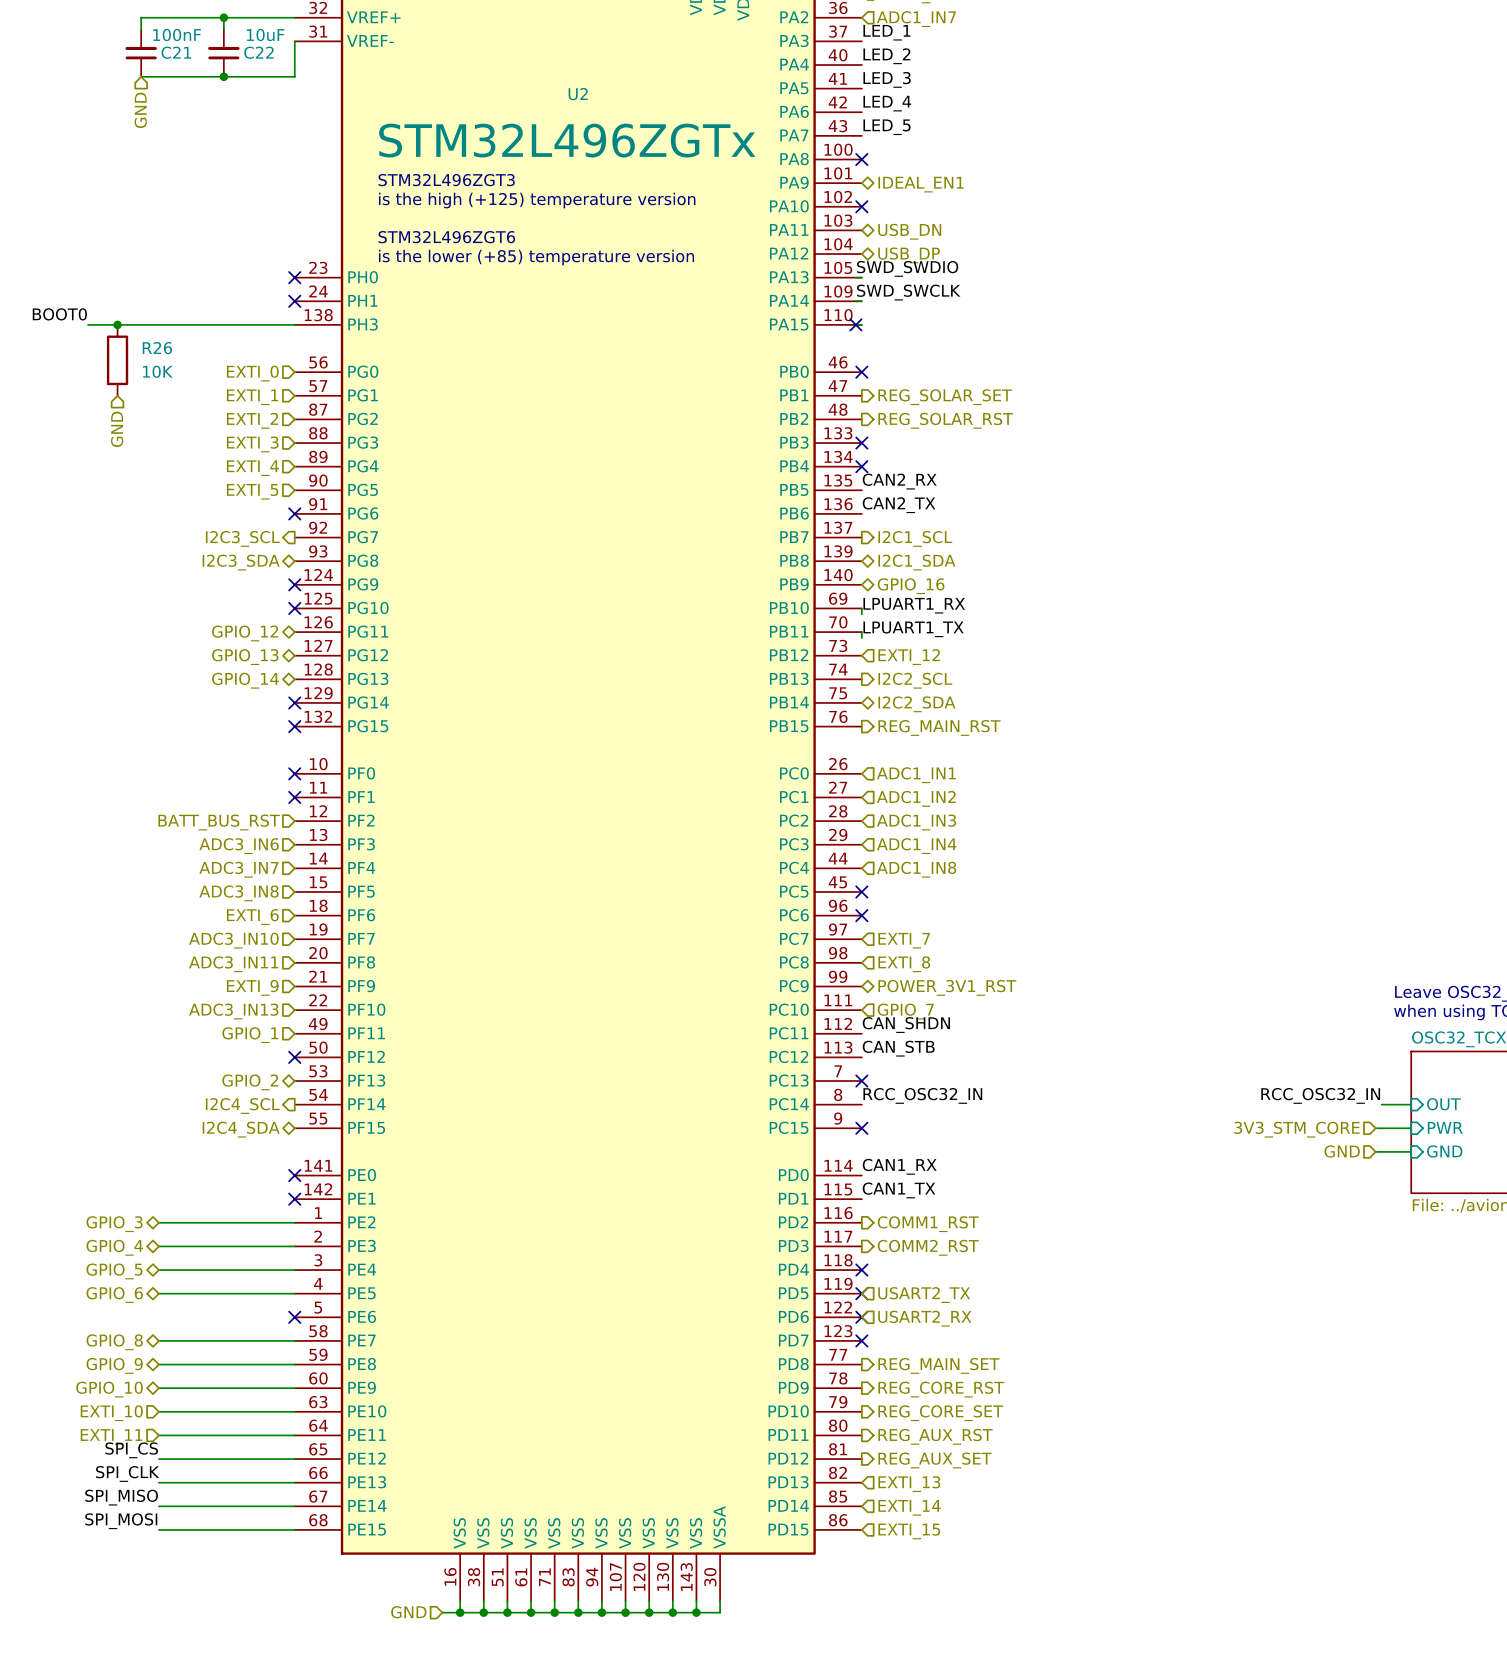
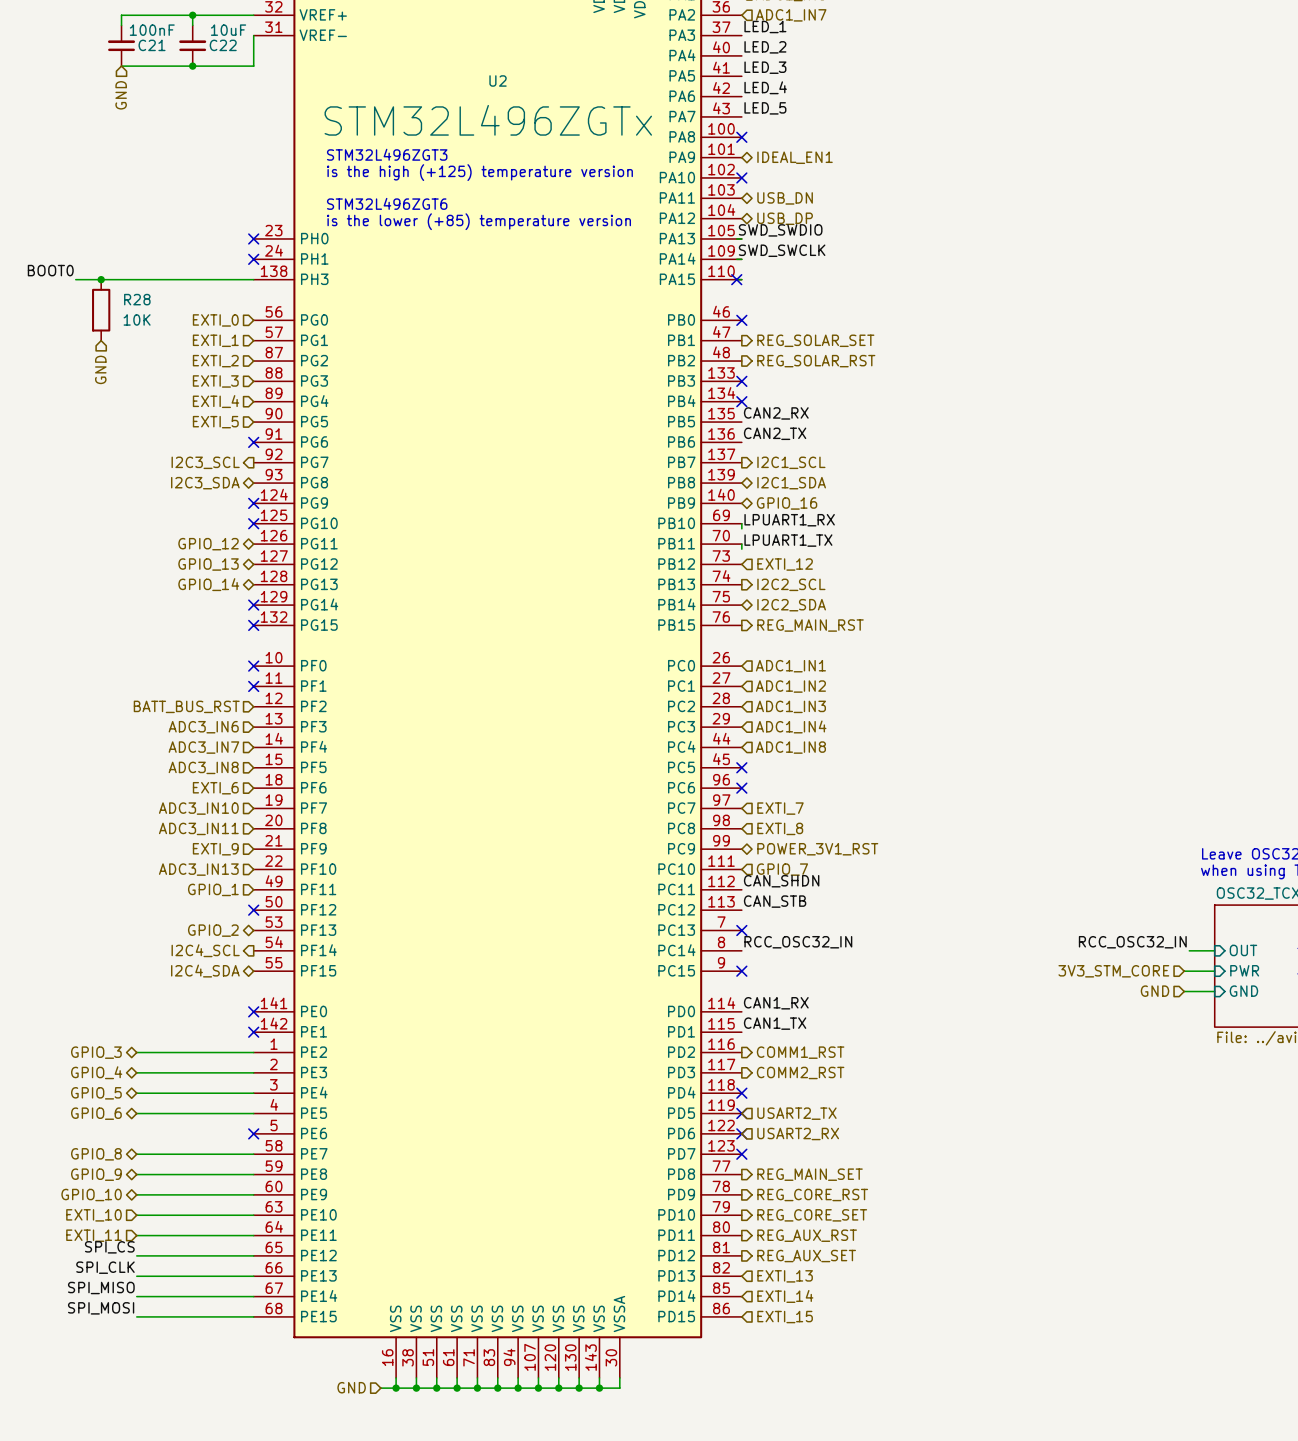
R26 name: R26 (157, 348) -> R28 (137, 299)

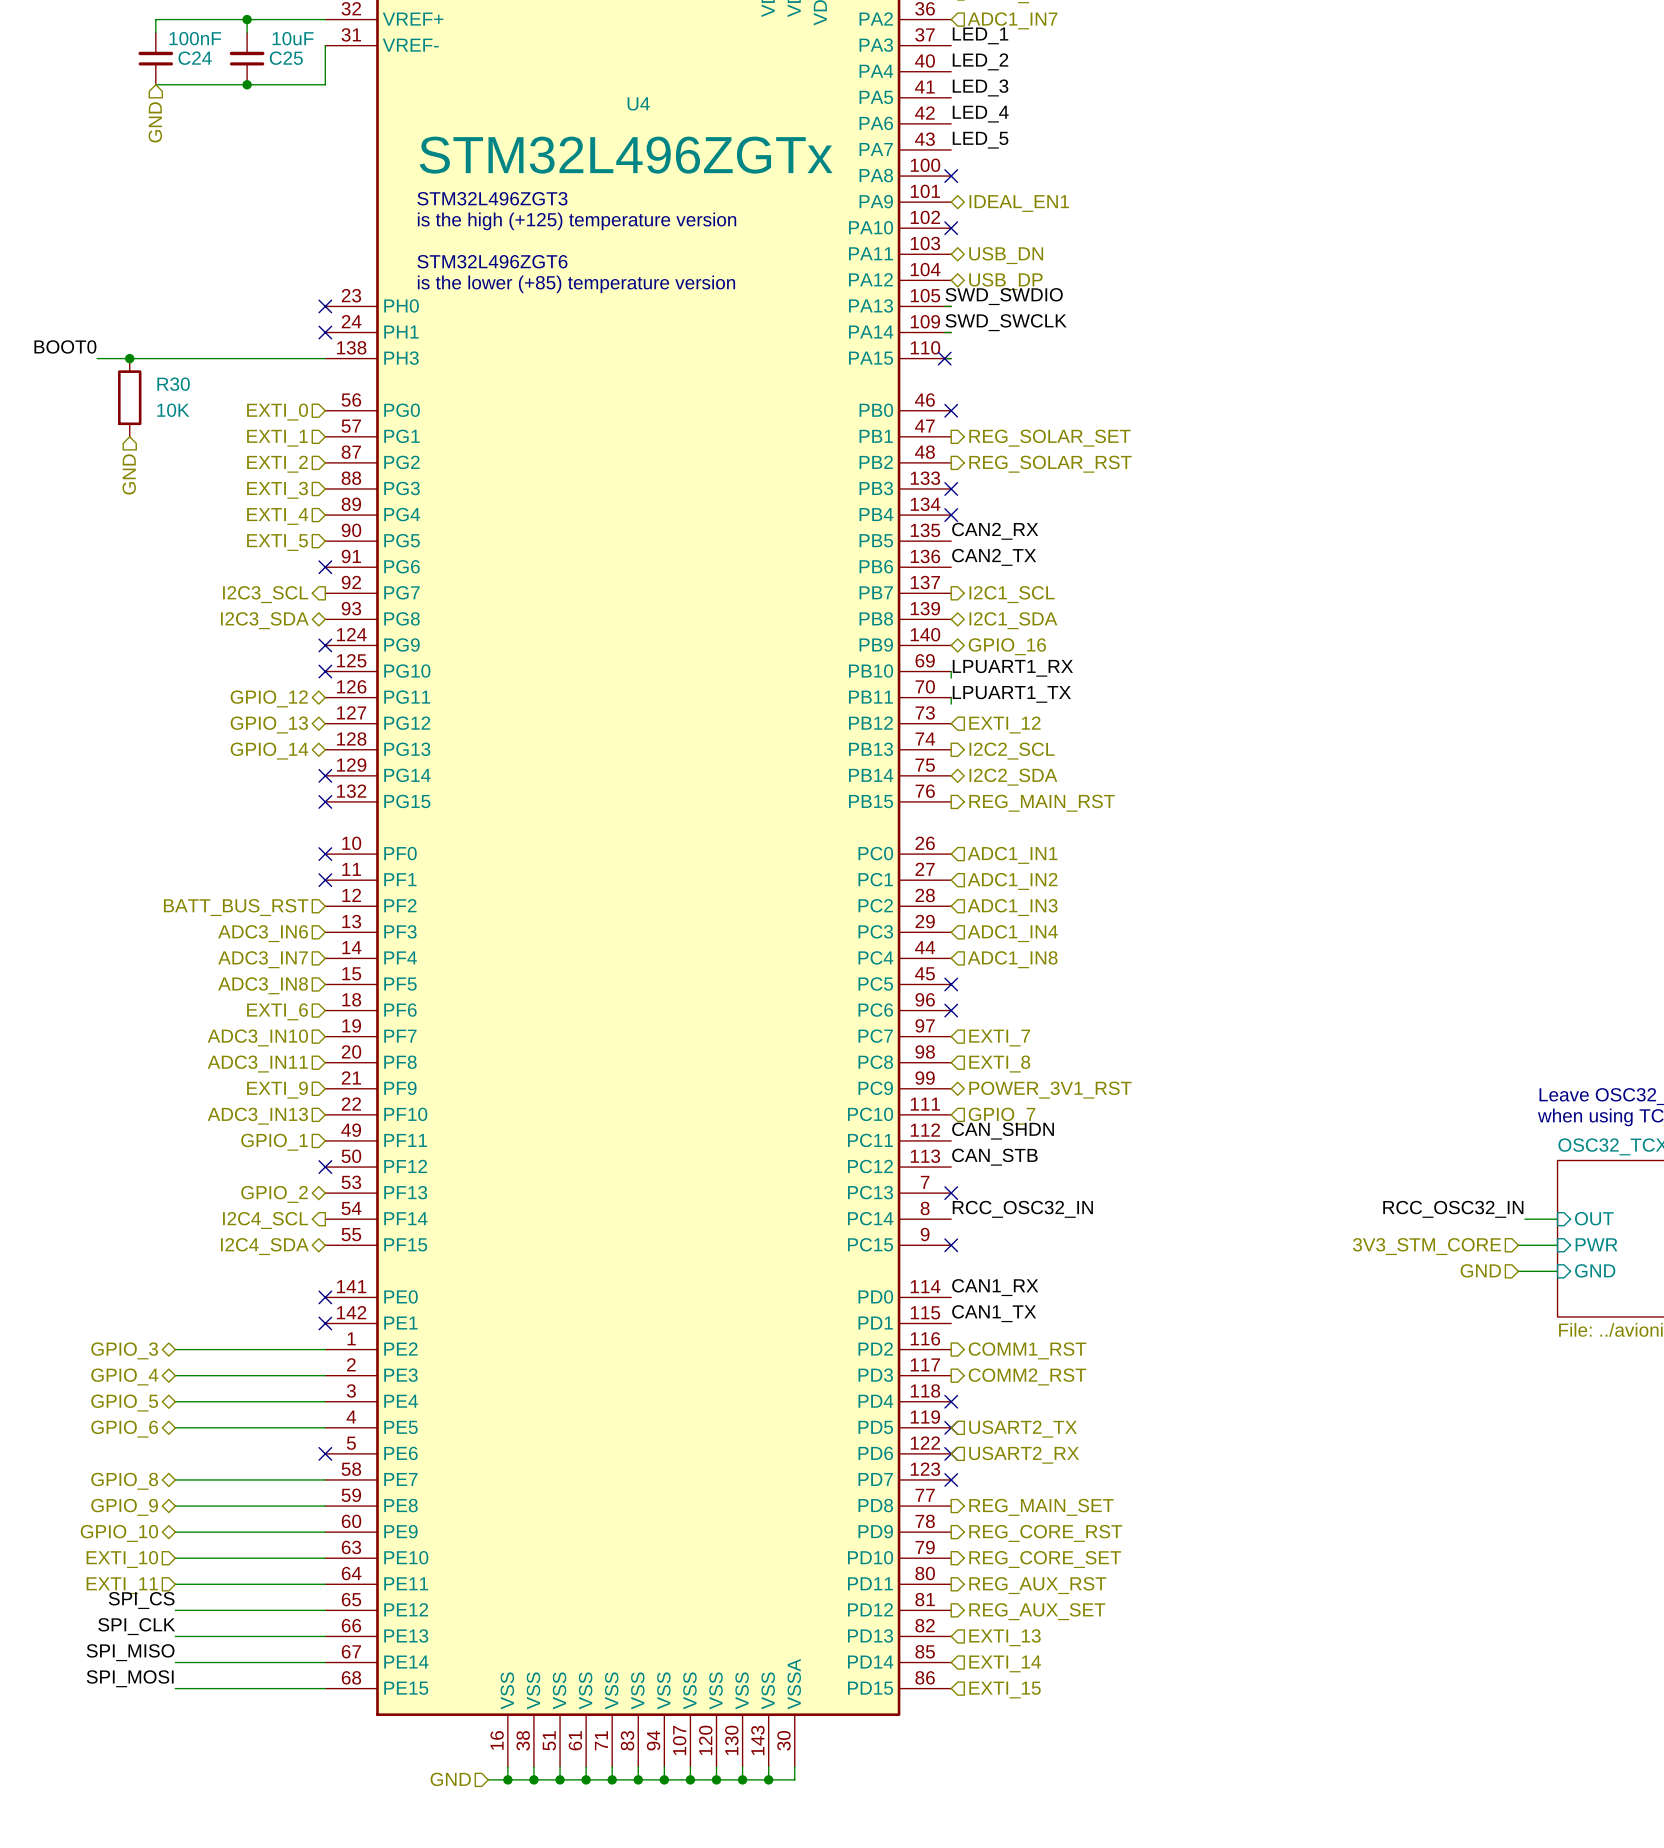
C21 name: C21 (152, 45) -> C24 (195, 58)
C22 name: C22 (223, 45) -> C25 (286, 58)
U2 name: U2 (498, 80) -> U4 (638, 103)
R28 name: R28 (137, 299) -> R30 (173, 384)

